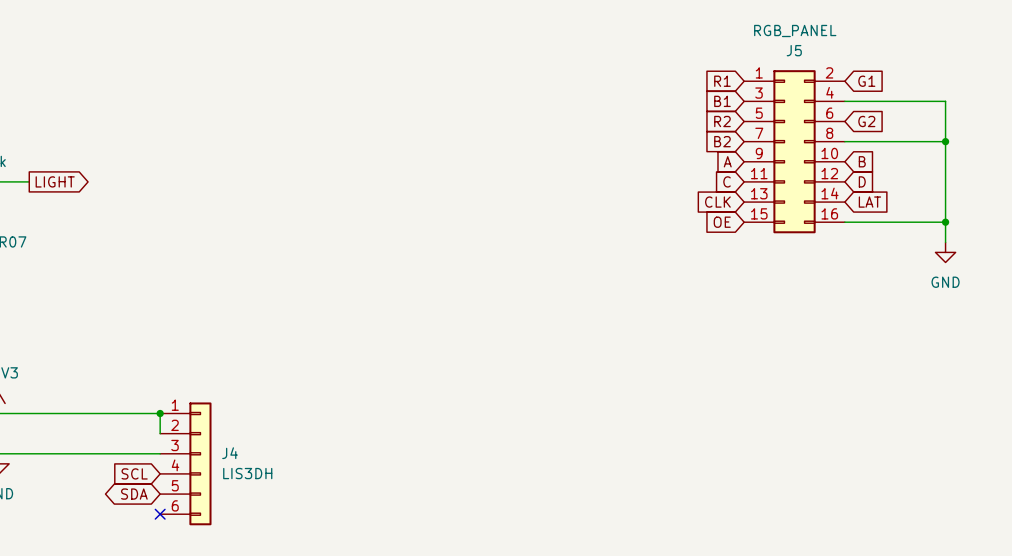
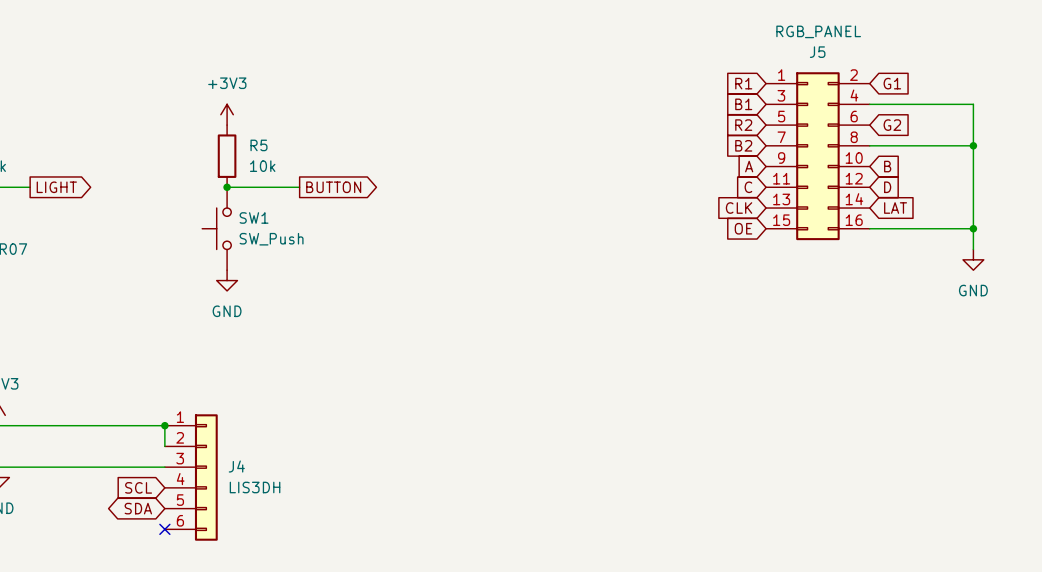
power symbol: none -> +3V3 (227, 114)
R5: none -> 10k (227, 156)
wire: none -> (227, 187) (299, 187)
junction: none -> (227, 187)
global label: none -> BUTTON (333, 187)
SW1: none -> SW_Push (216, 228)
power symbol: none -> GND (227, 280)

